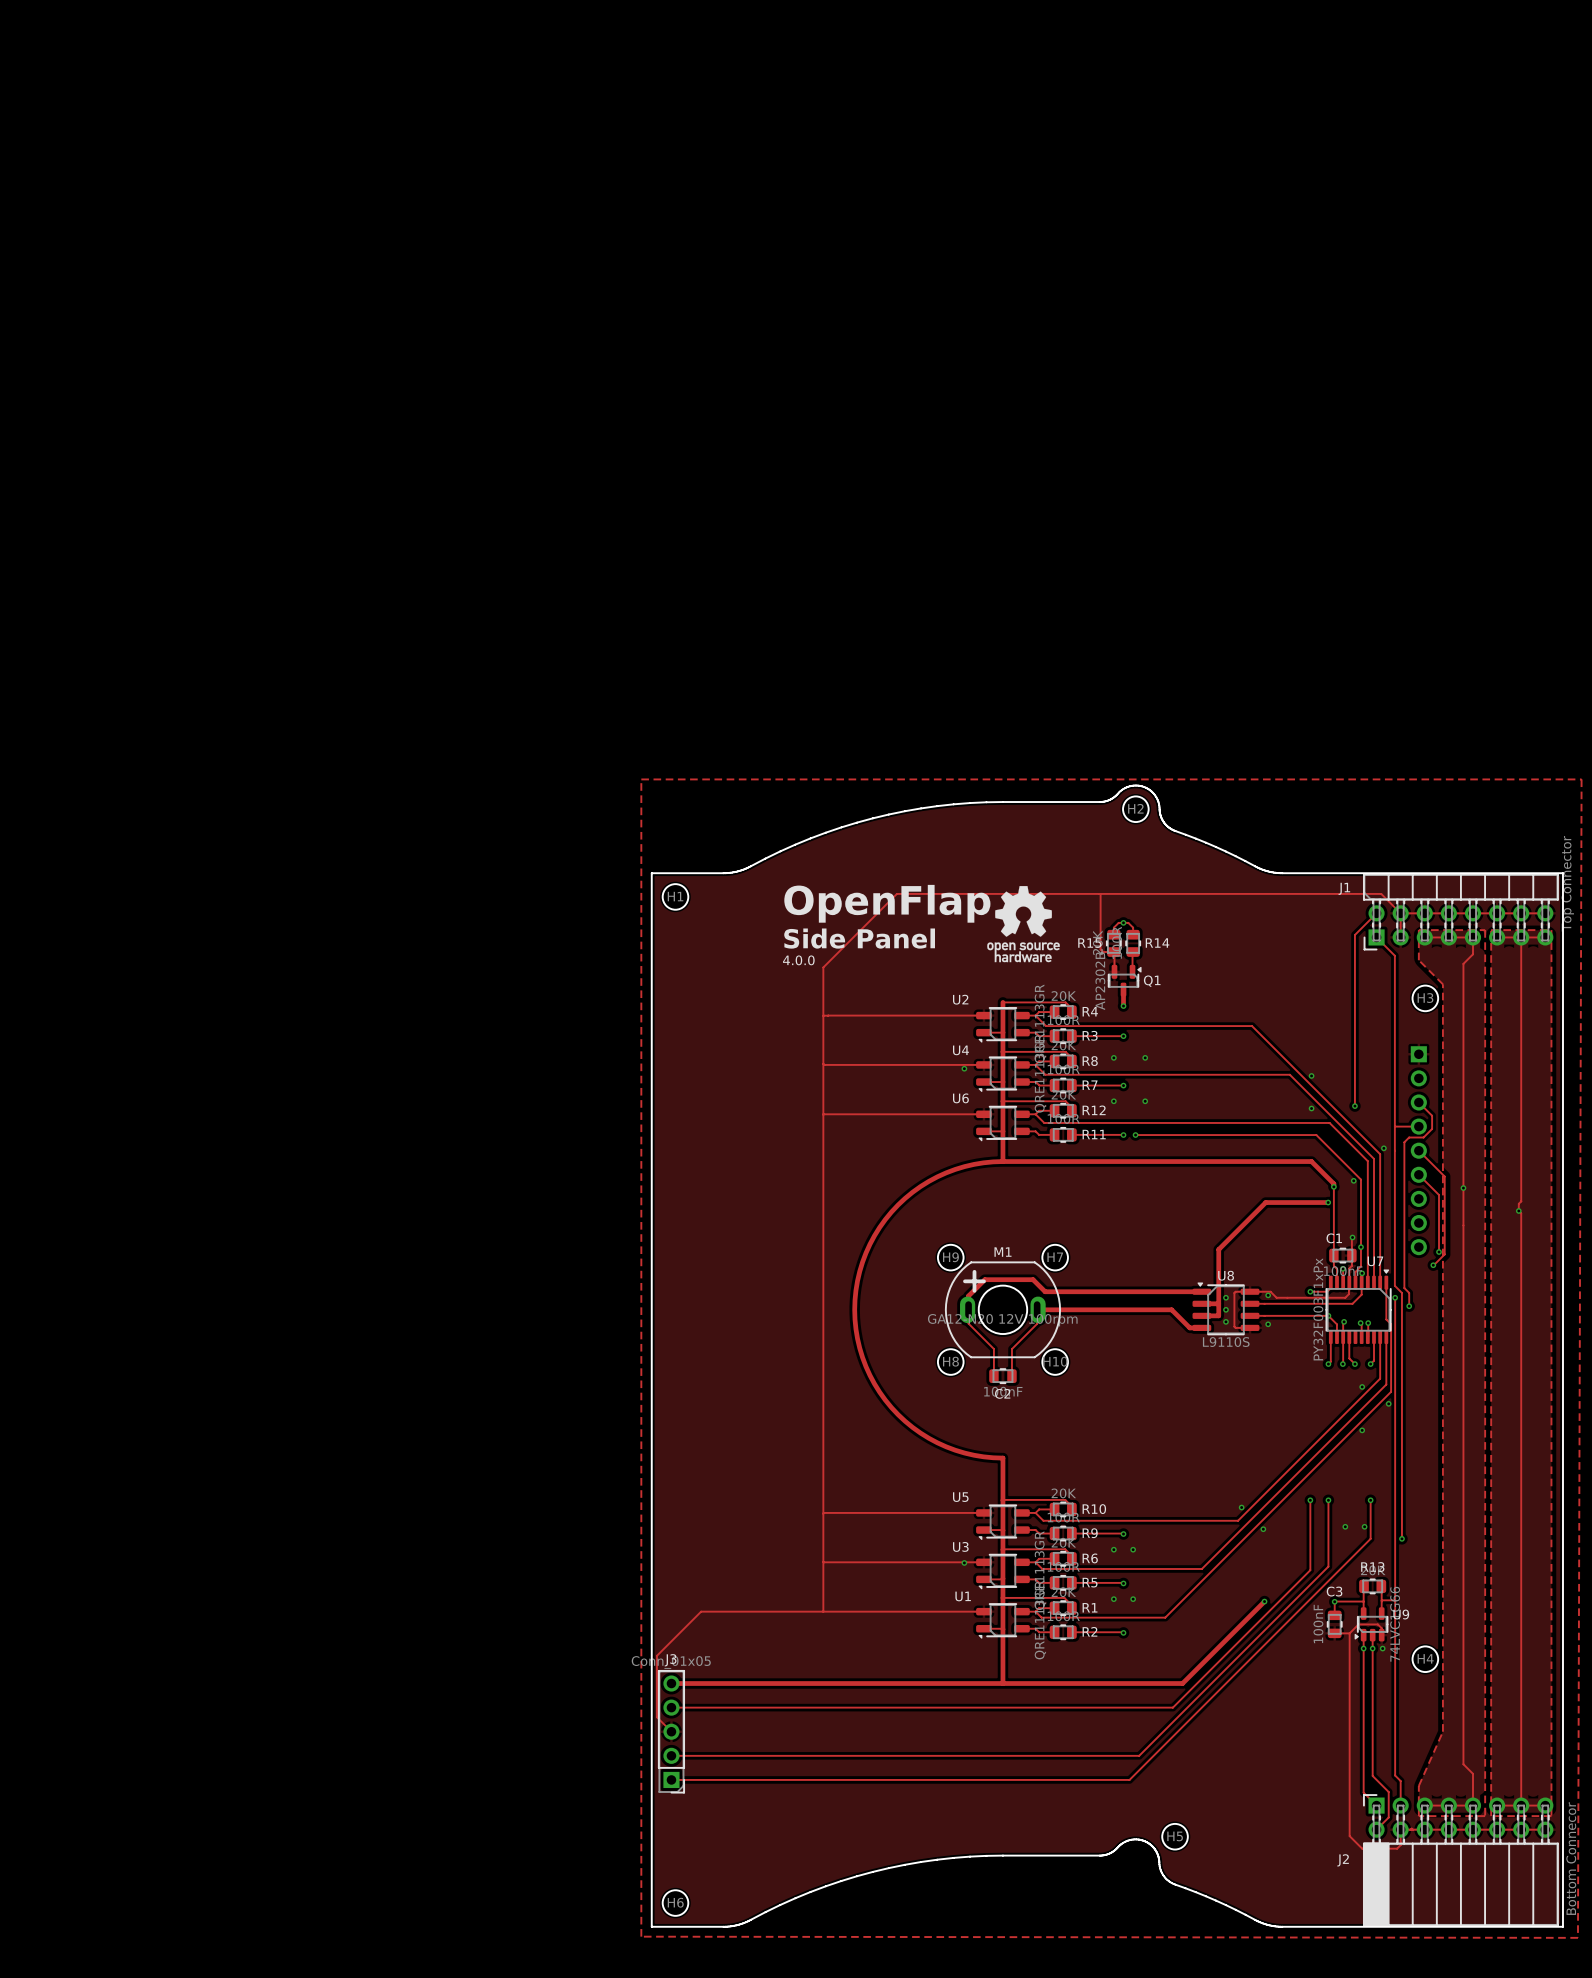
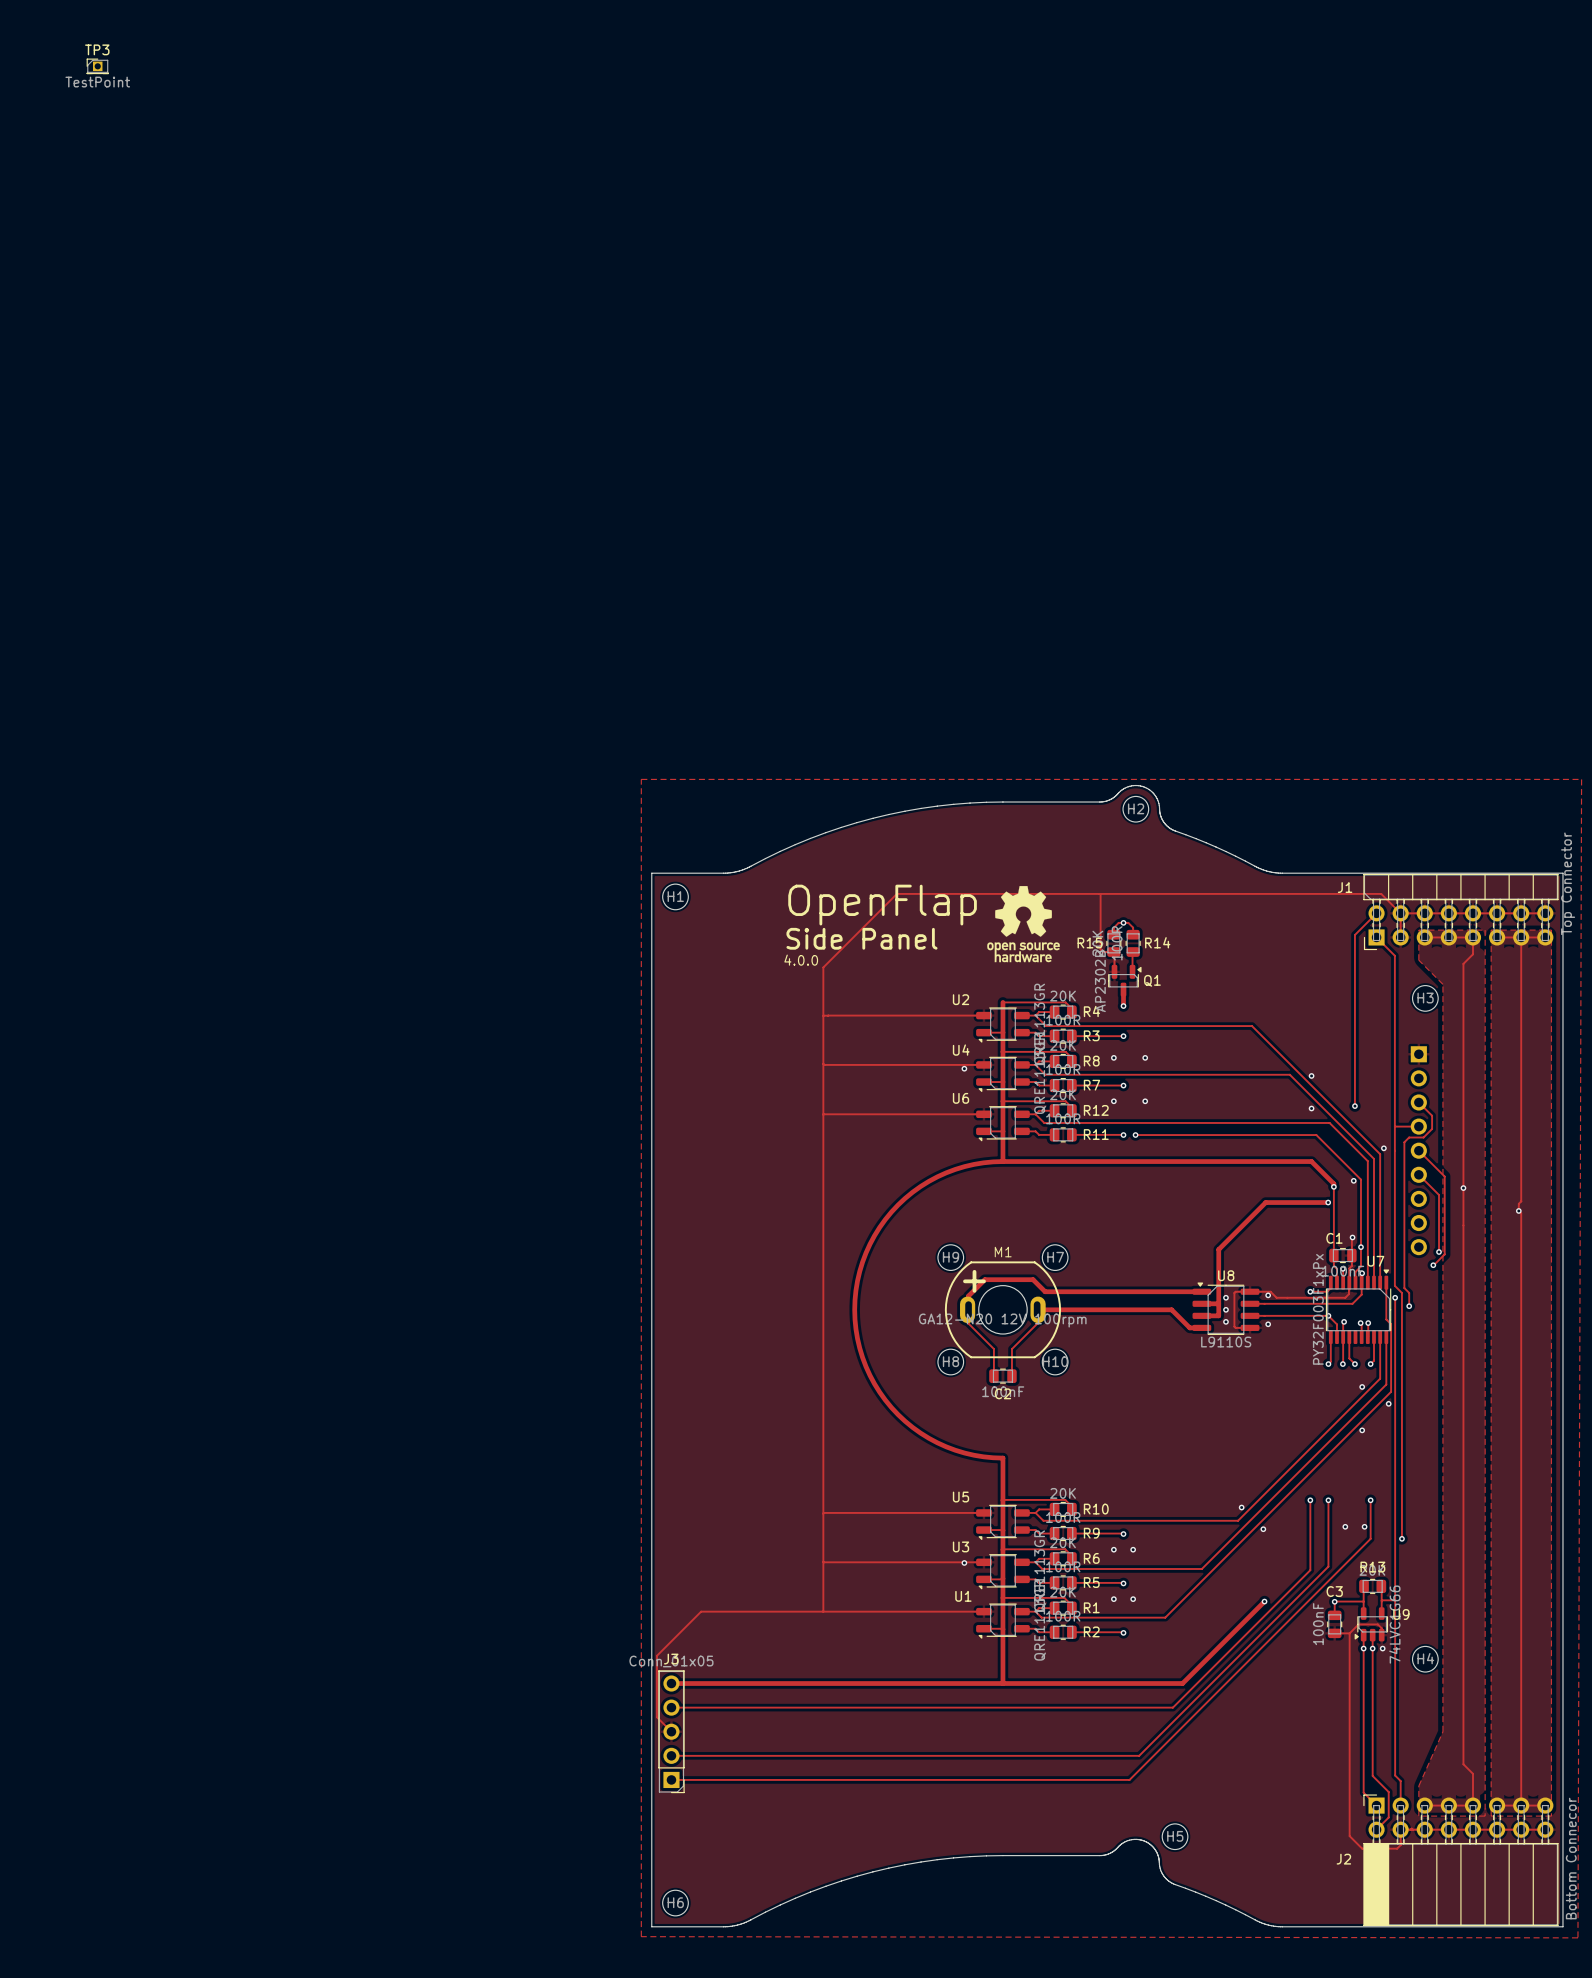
TP3: none -> TestPoint (97, 66)

